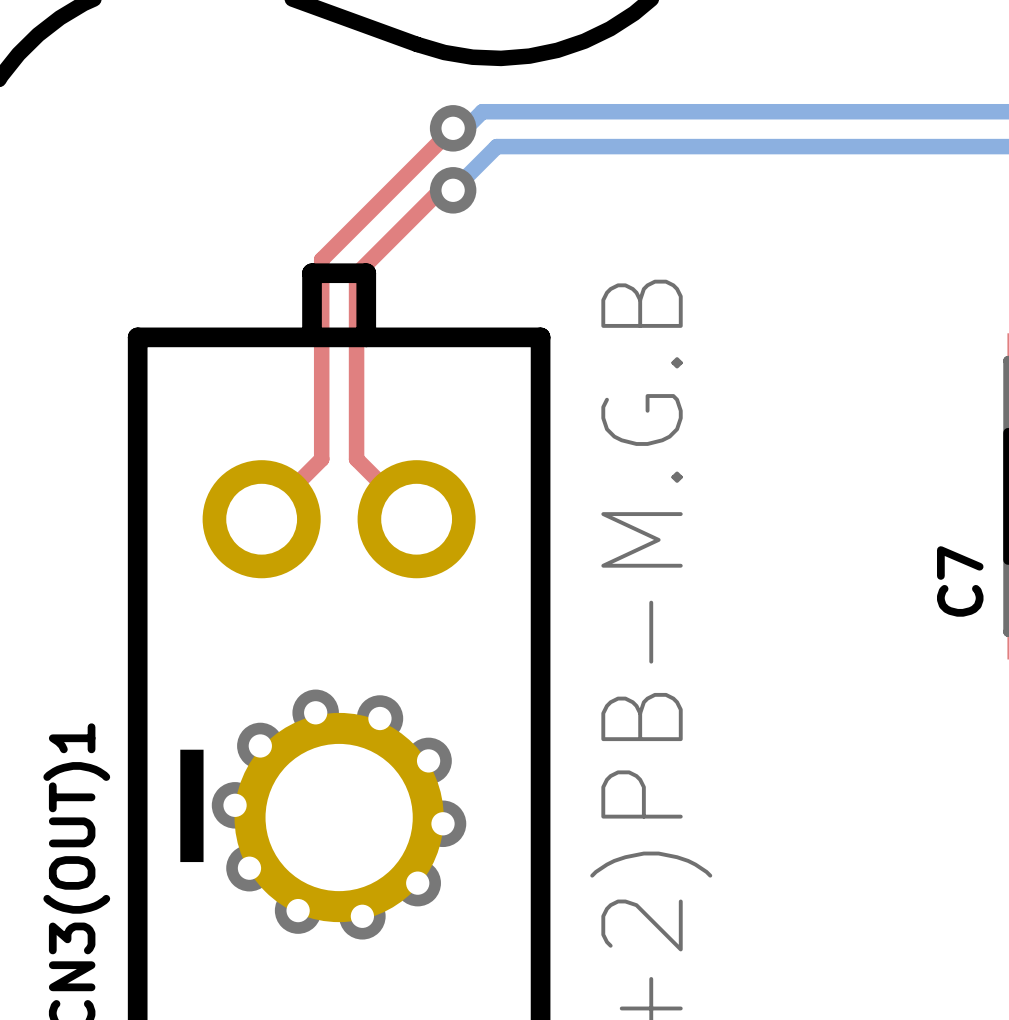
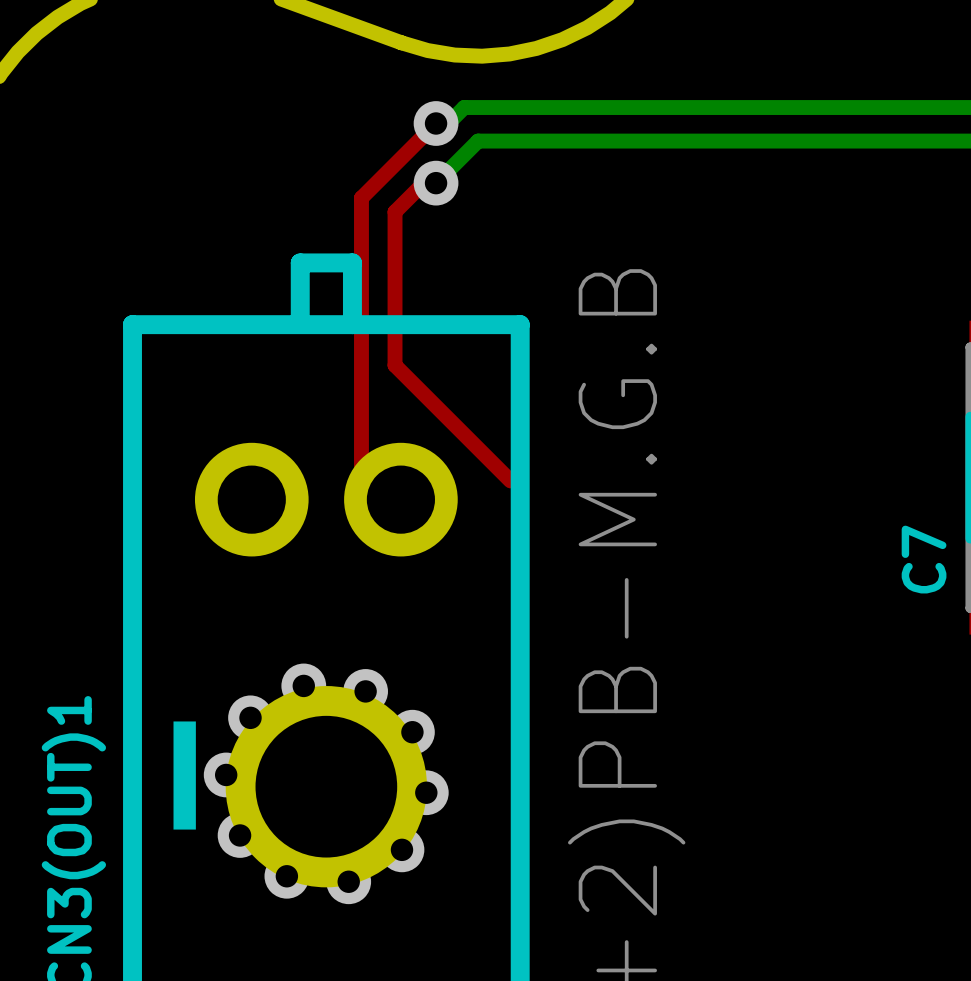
top track: (375, 205) (321, 259) (321, 459) (261, 519) -> (361, 198) (361, 480)
top track: (410, 220) (356, 274) (356, 459) (416, 519) -> (395, 211) (395, 365) (510, 480)

